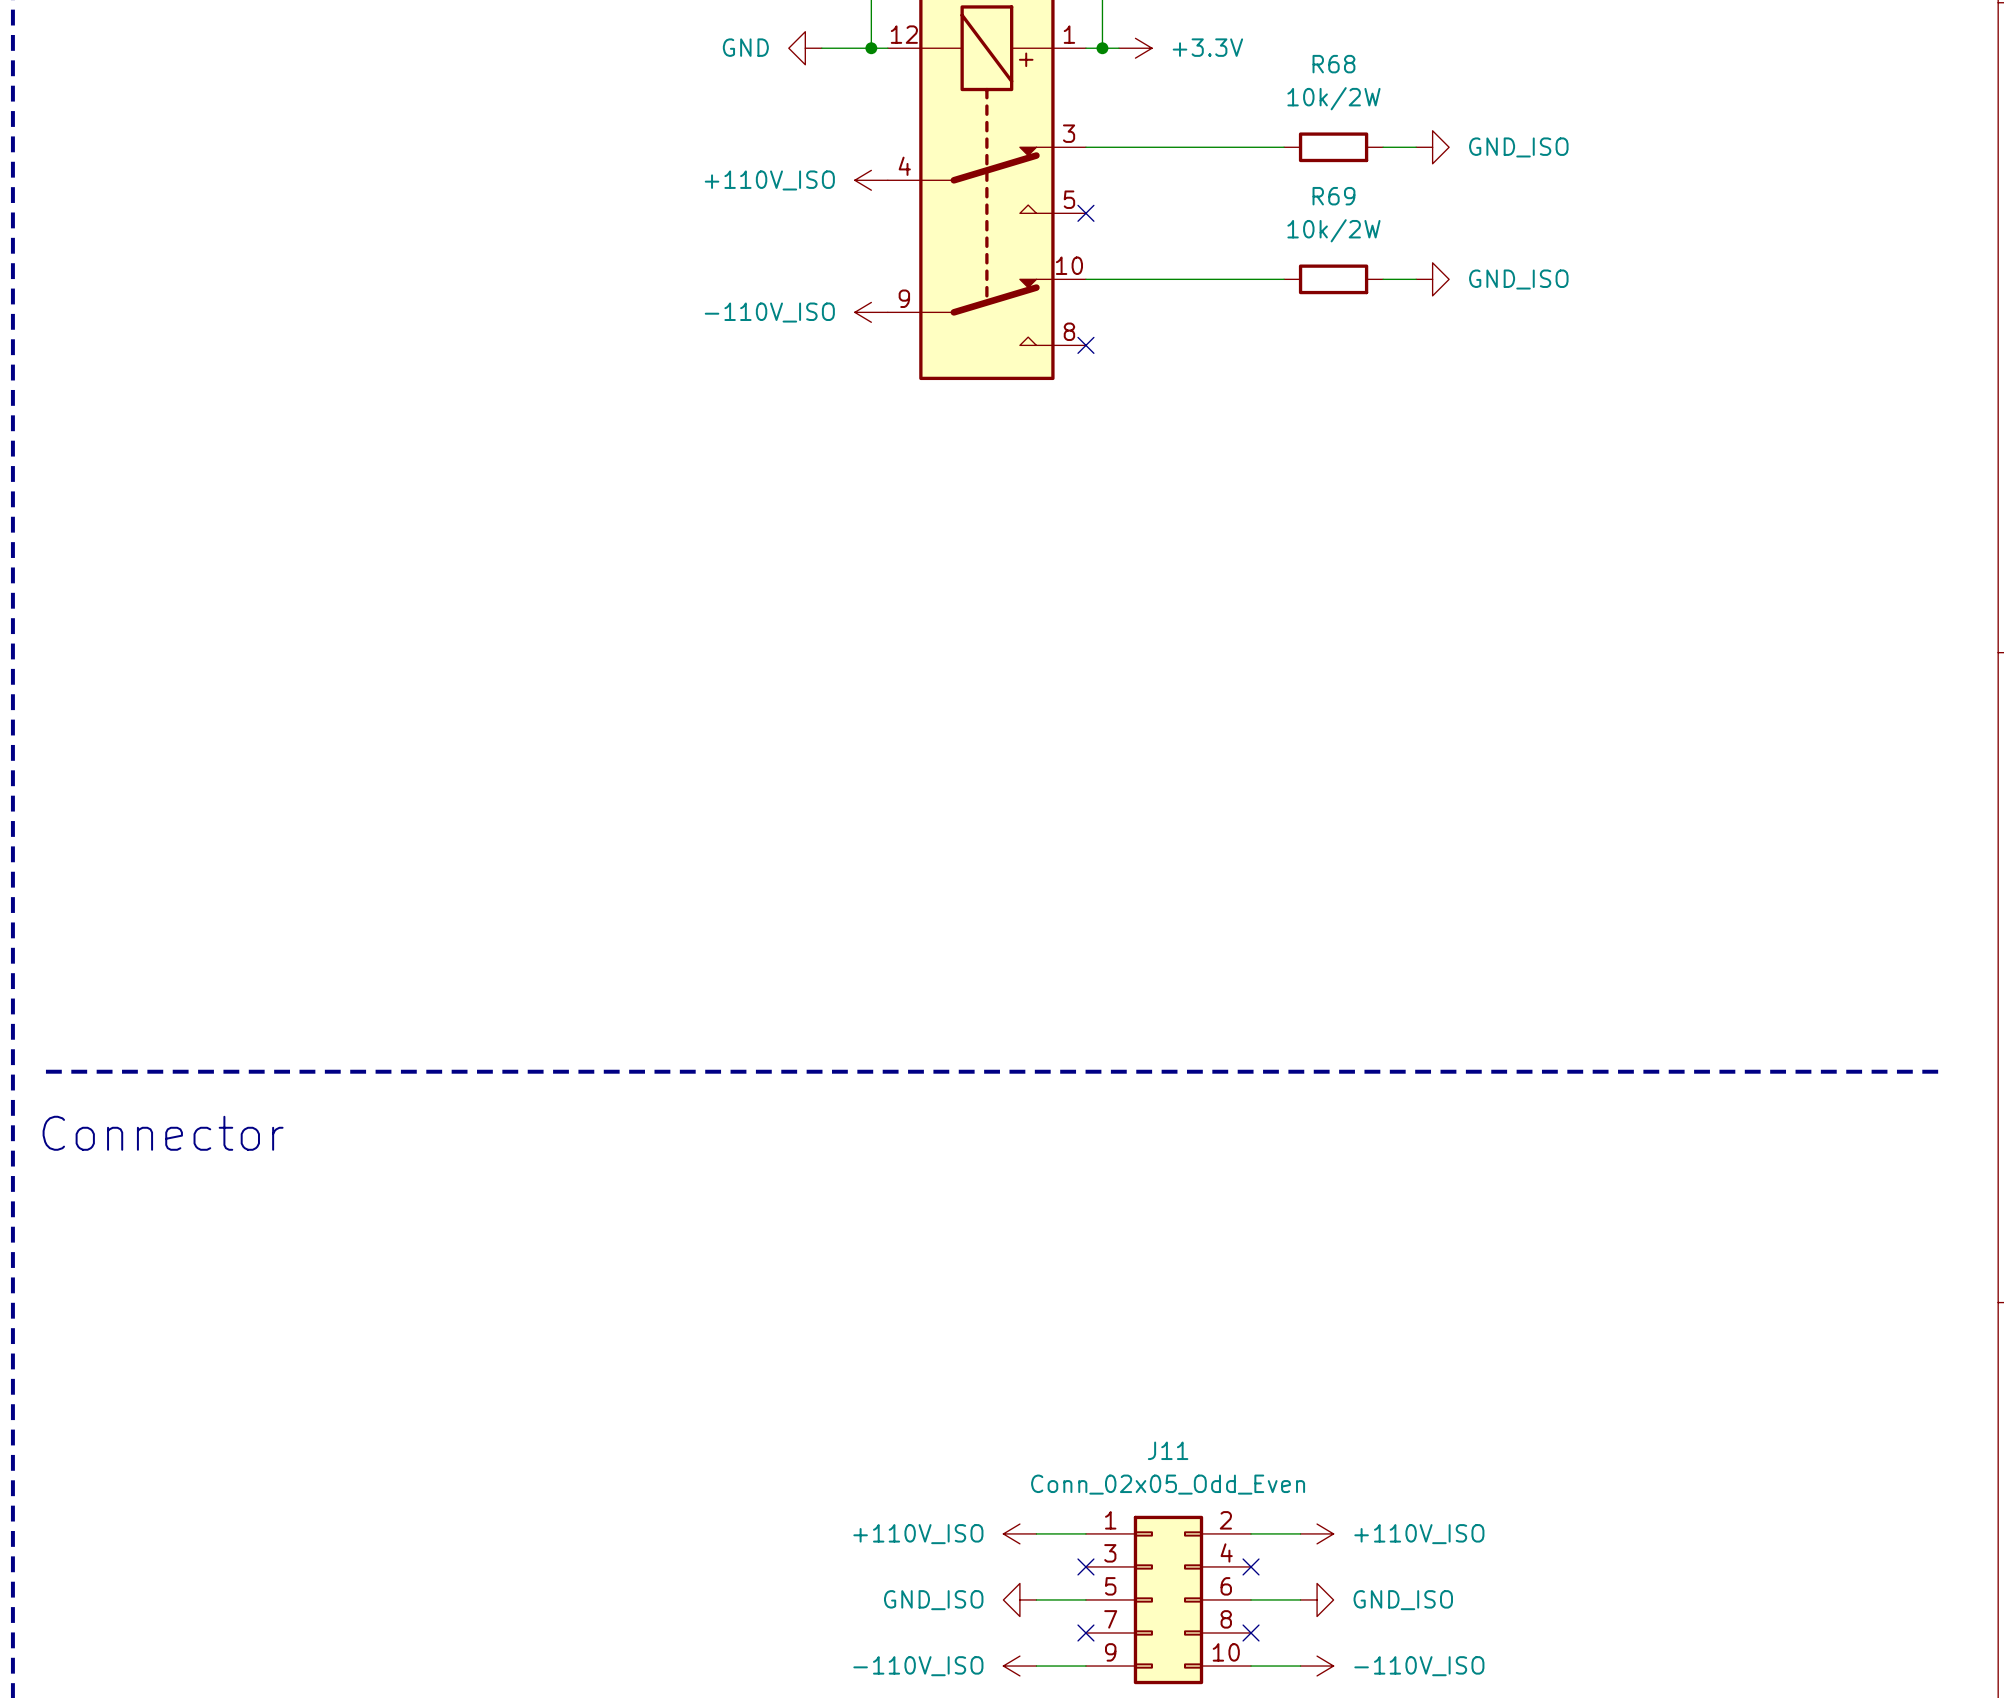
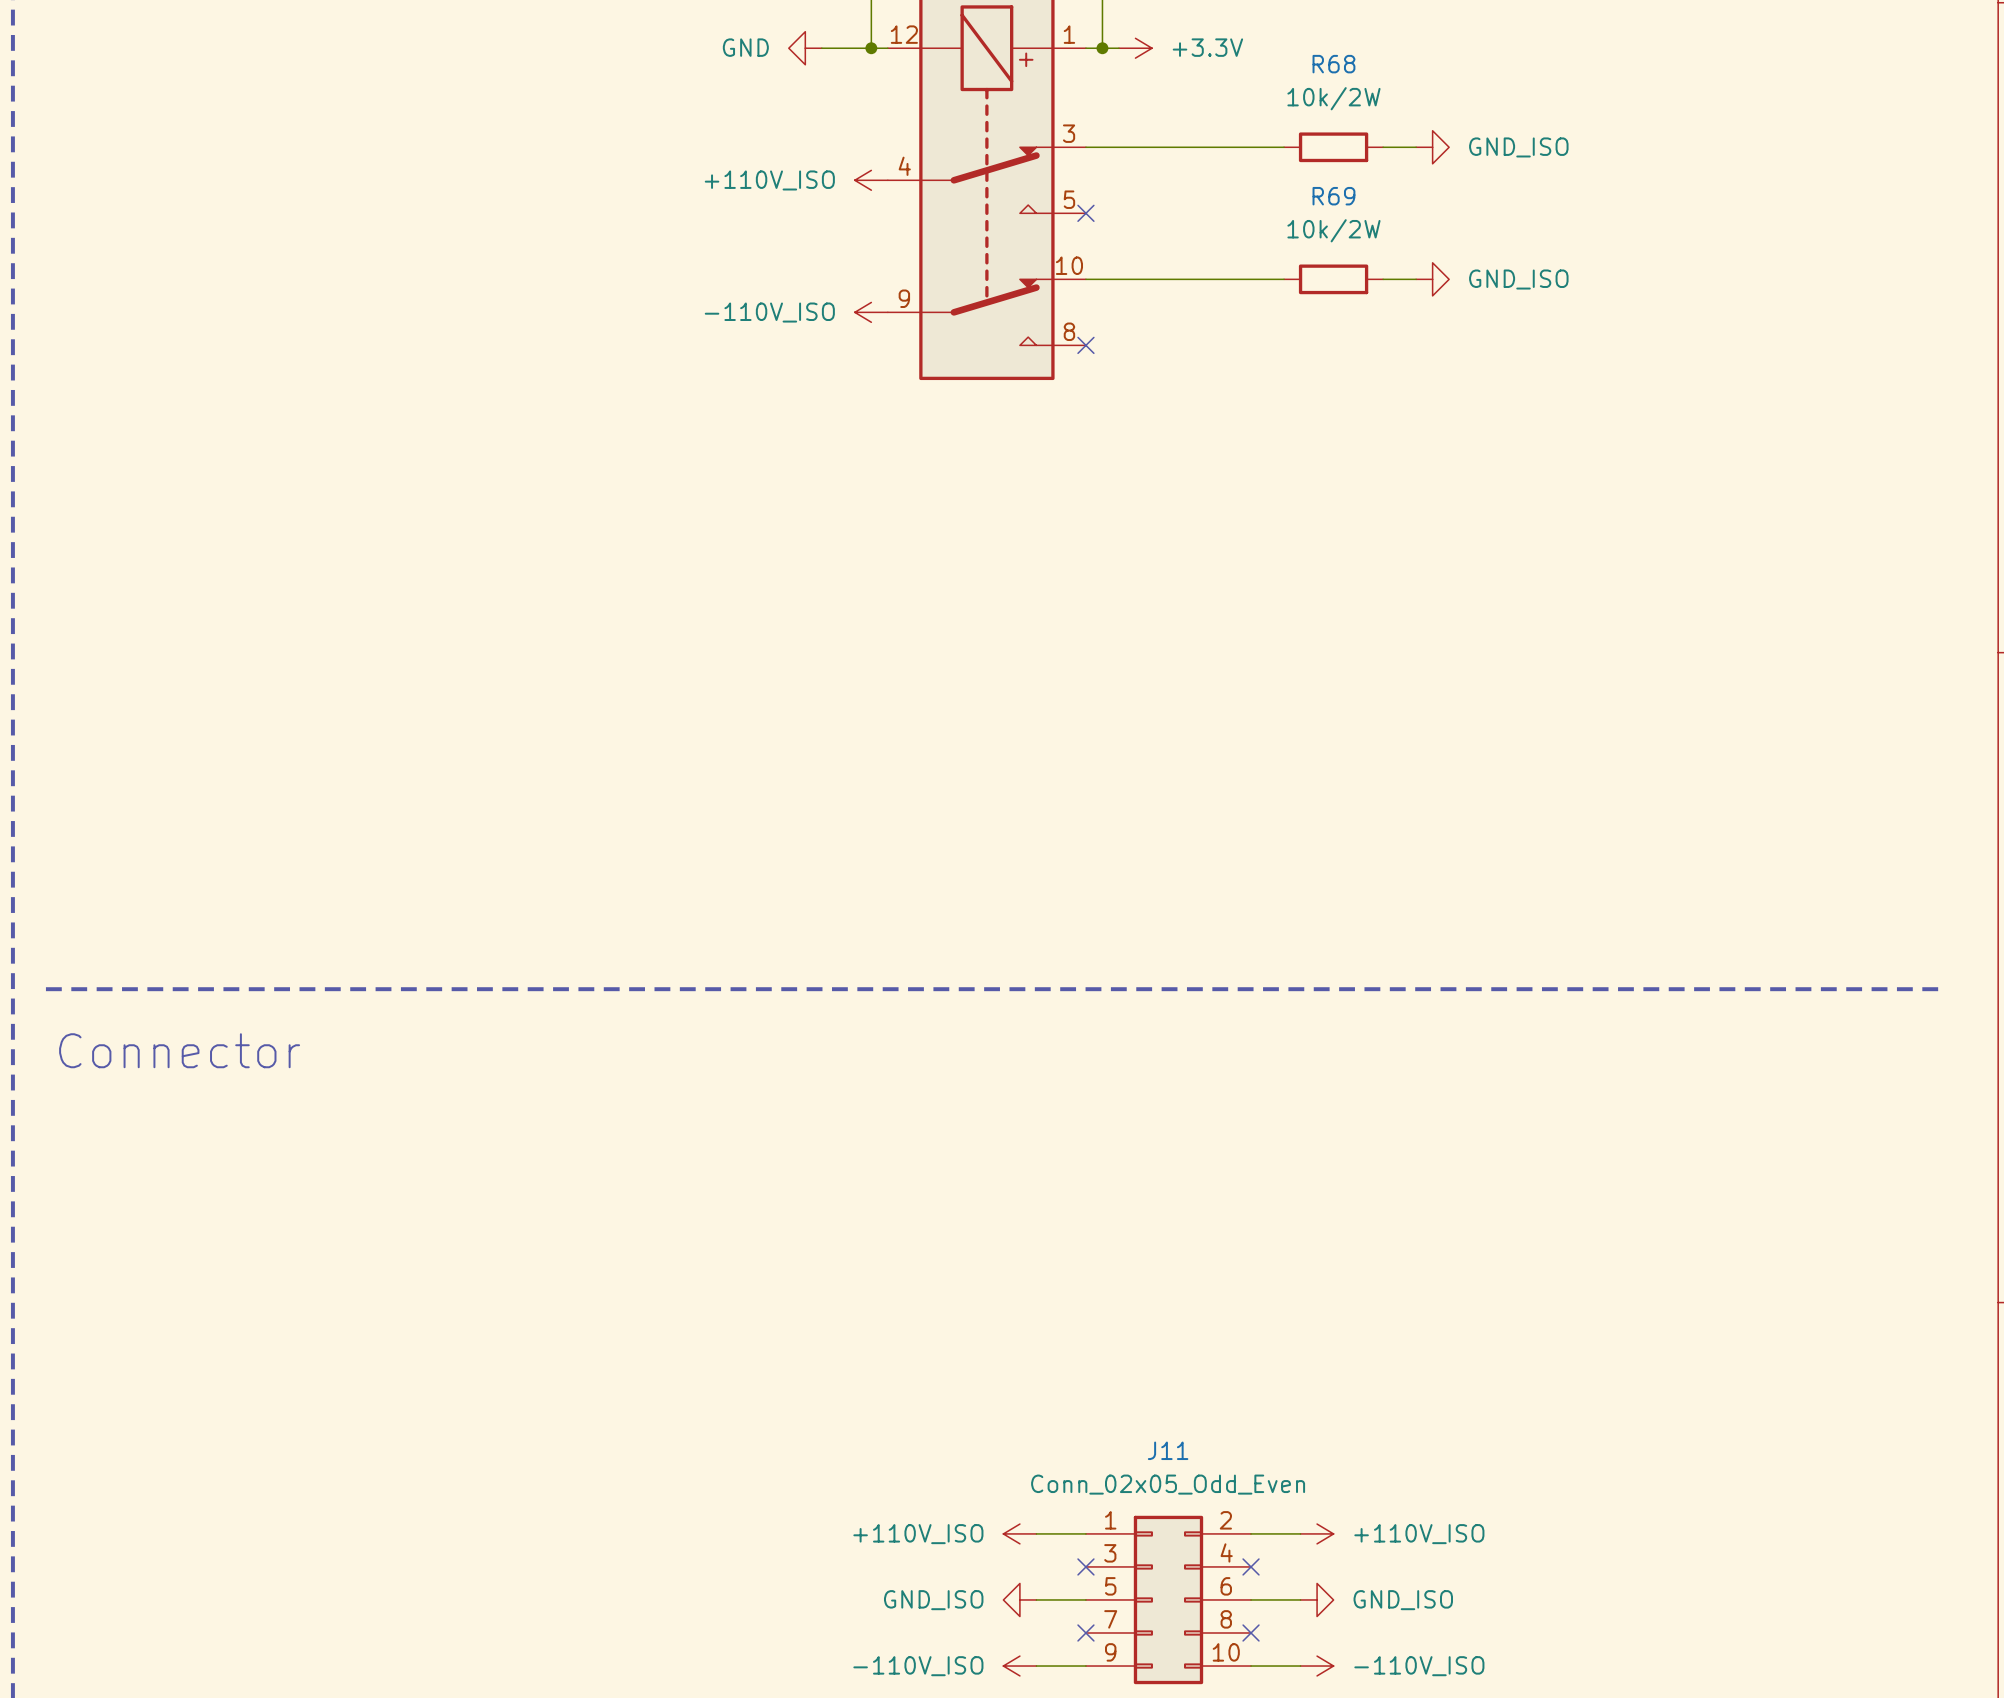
line: (45, 1071) (1944, 1071) -> (45, 989) (1944, 989)
text position: Connector (163, 1133) -> Connector (179, 1050)

